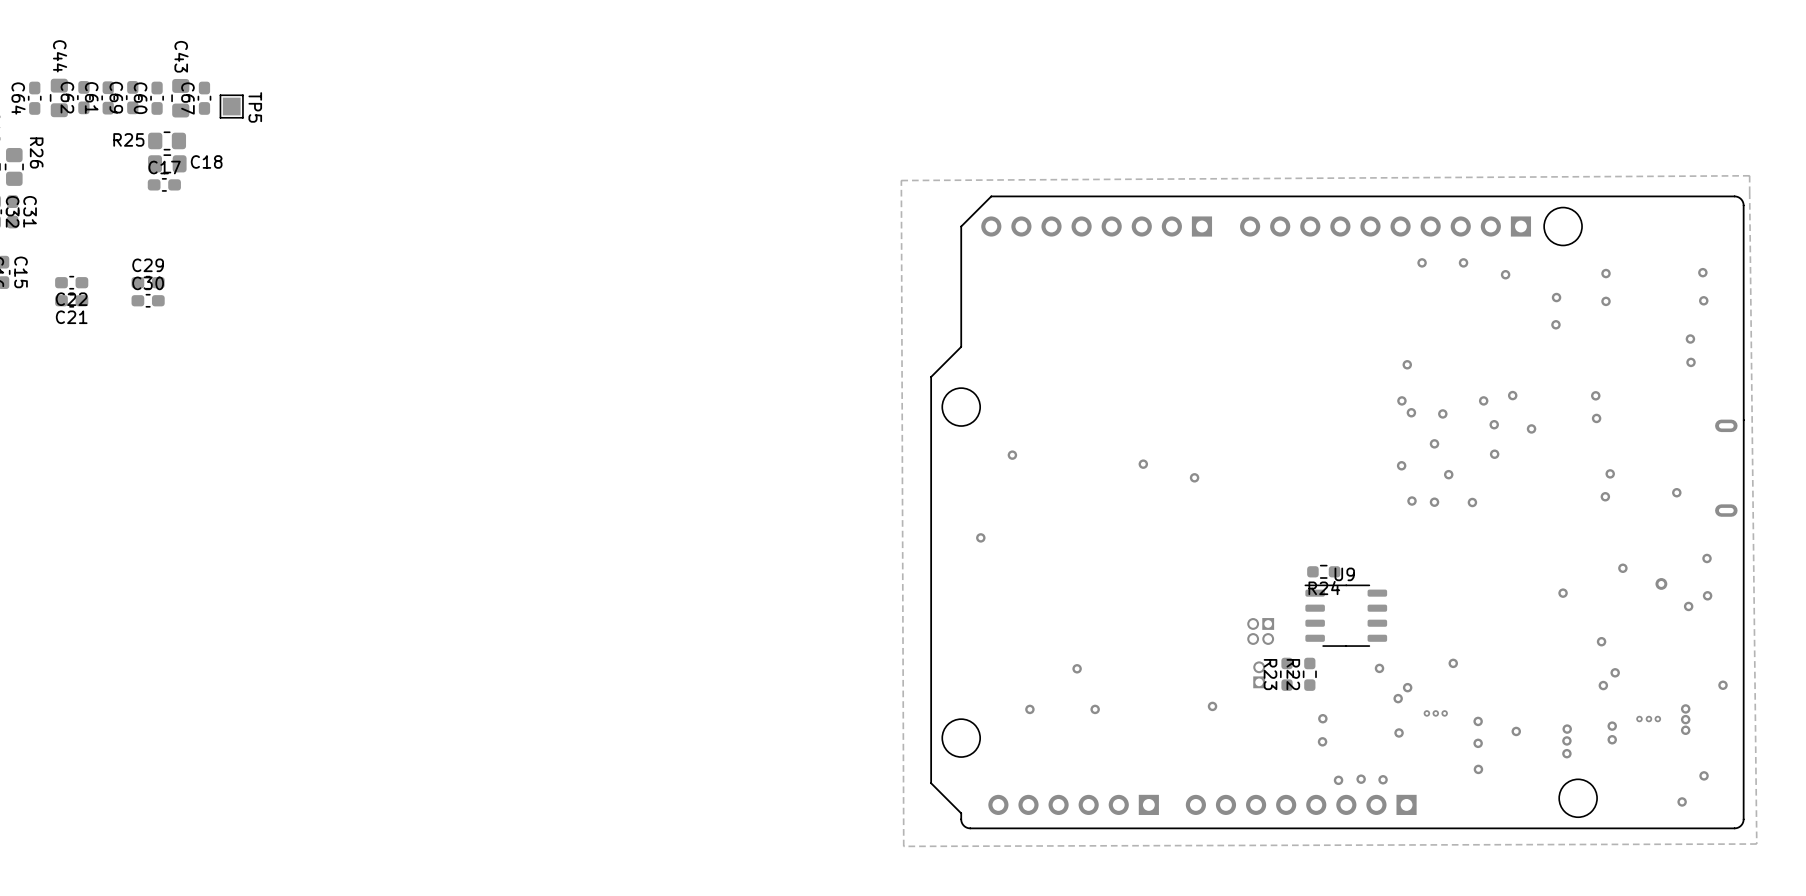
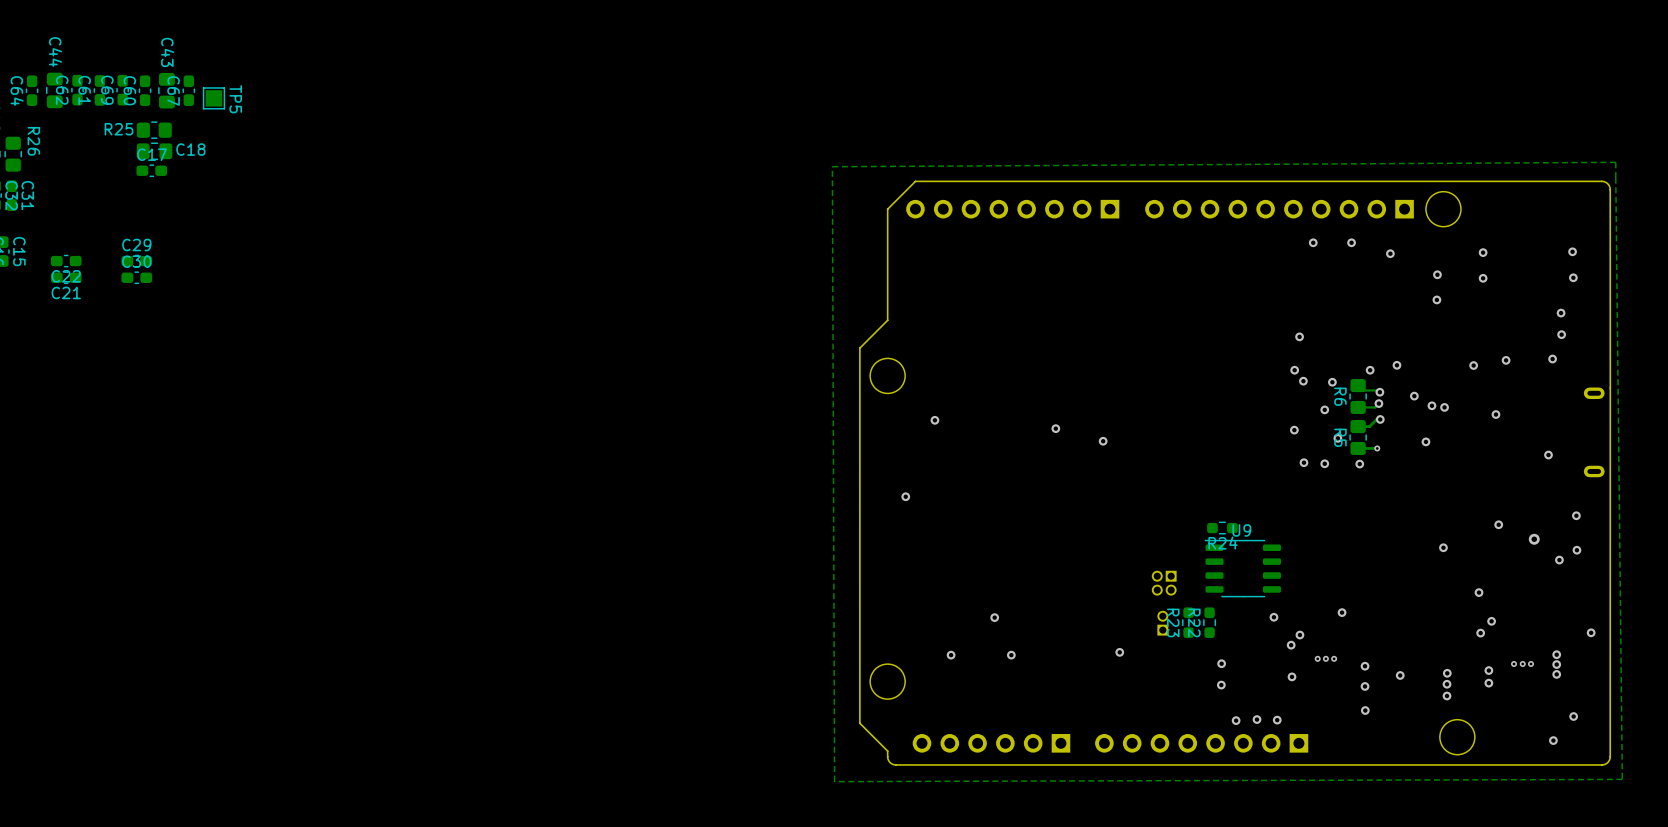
via: none -> (1552, 359)
via: none -> (1506, 360)
track: none -> (1358, 385) (1363, 390) (1378, 390)
via: (1596, 418) -> none
R6: none -> (1358, 396)
track: none -> (1378, 403) (1375, 407) (1358, 407)
via: none -> (1378, 403)
via: none -> (1431, 405)
via: none -> (1444, 407)
via: none -> (1495, 414)
track: none -> (1379, 419) (1376, 419) (1369, 426) (1358, 426)
R5: none -> (1358, 437)
via: (1610, 473) -> none
via: none -> (1425, 441)
track: none -> (1377, 448) (1358, 448)
via: none -> (1377, 448)
via: (1605, 496) -> none

